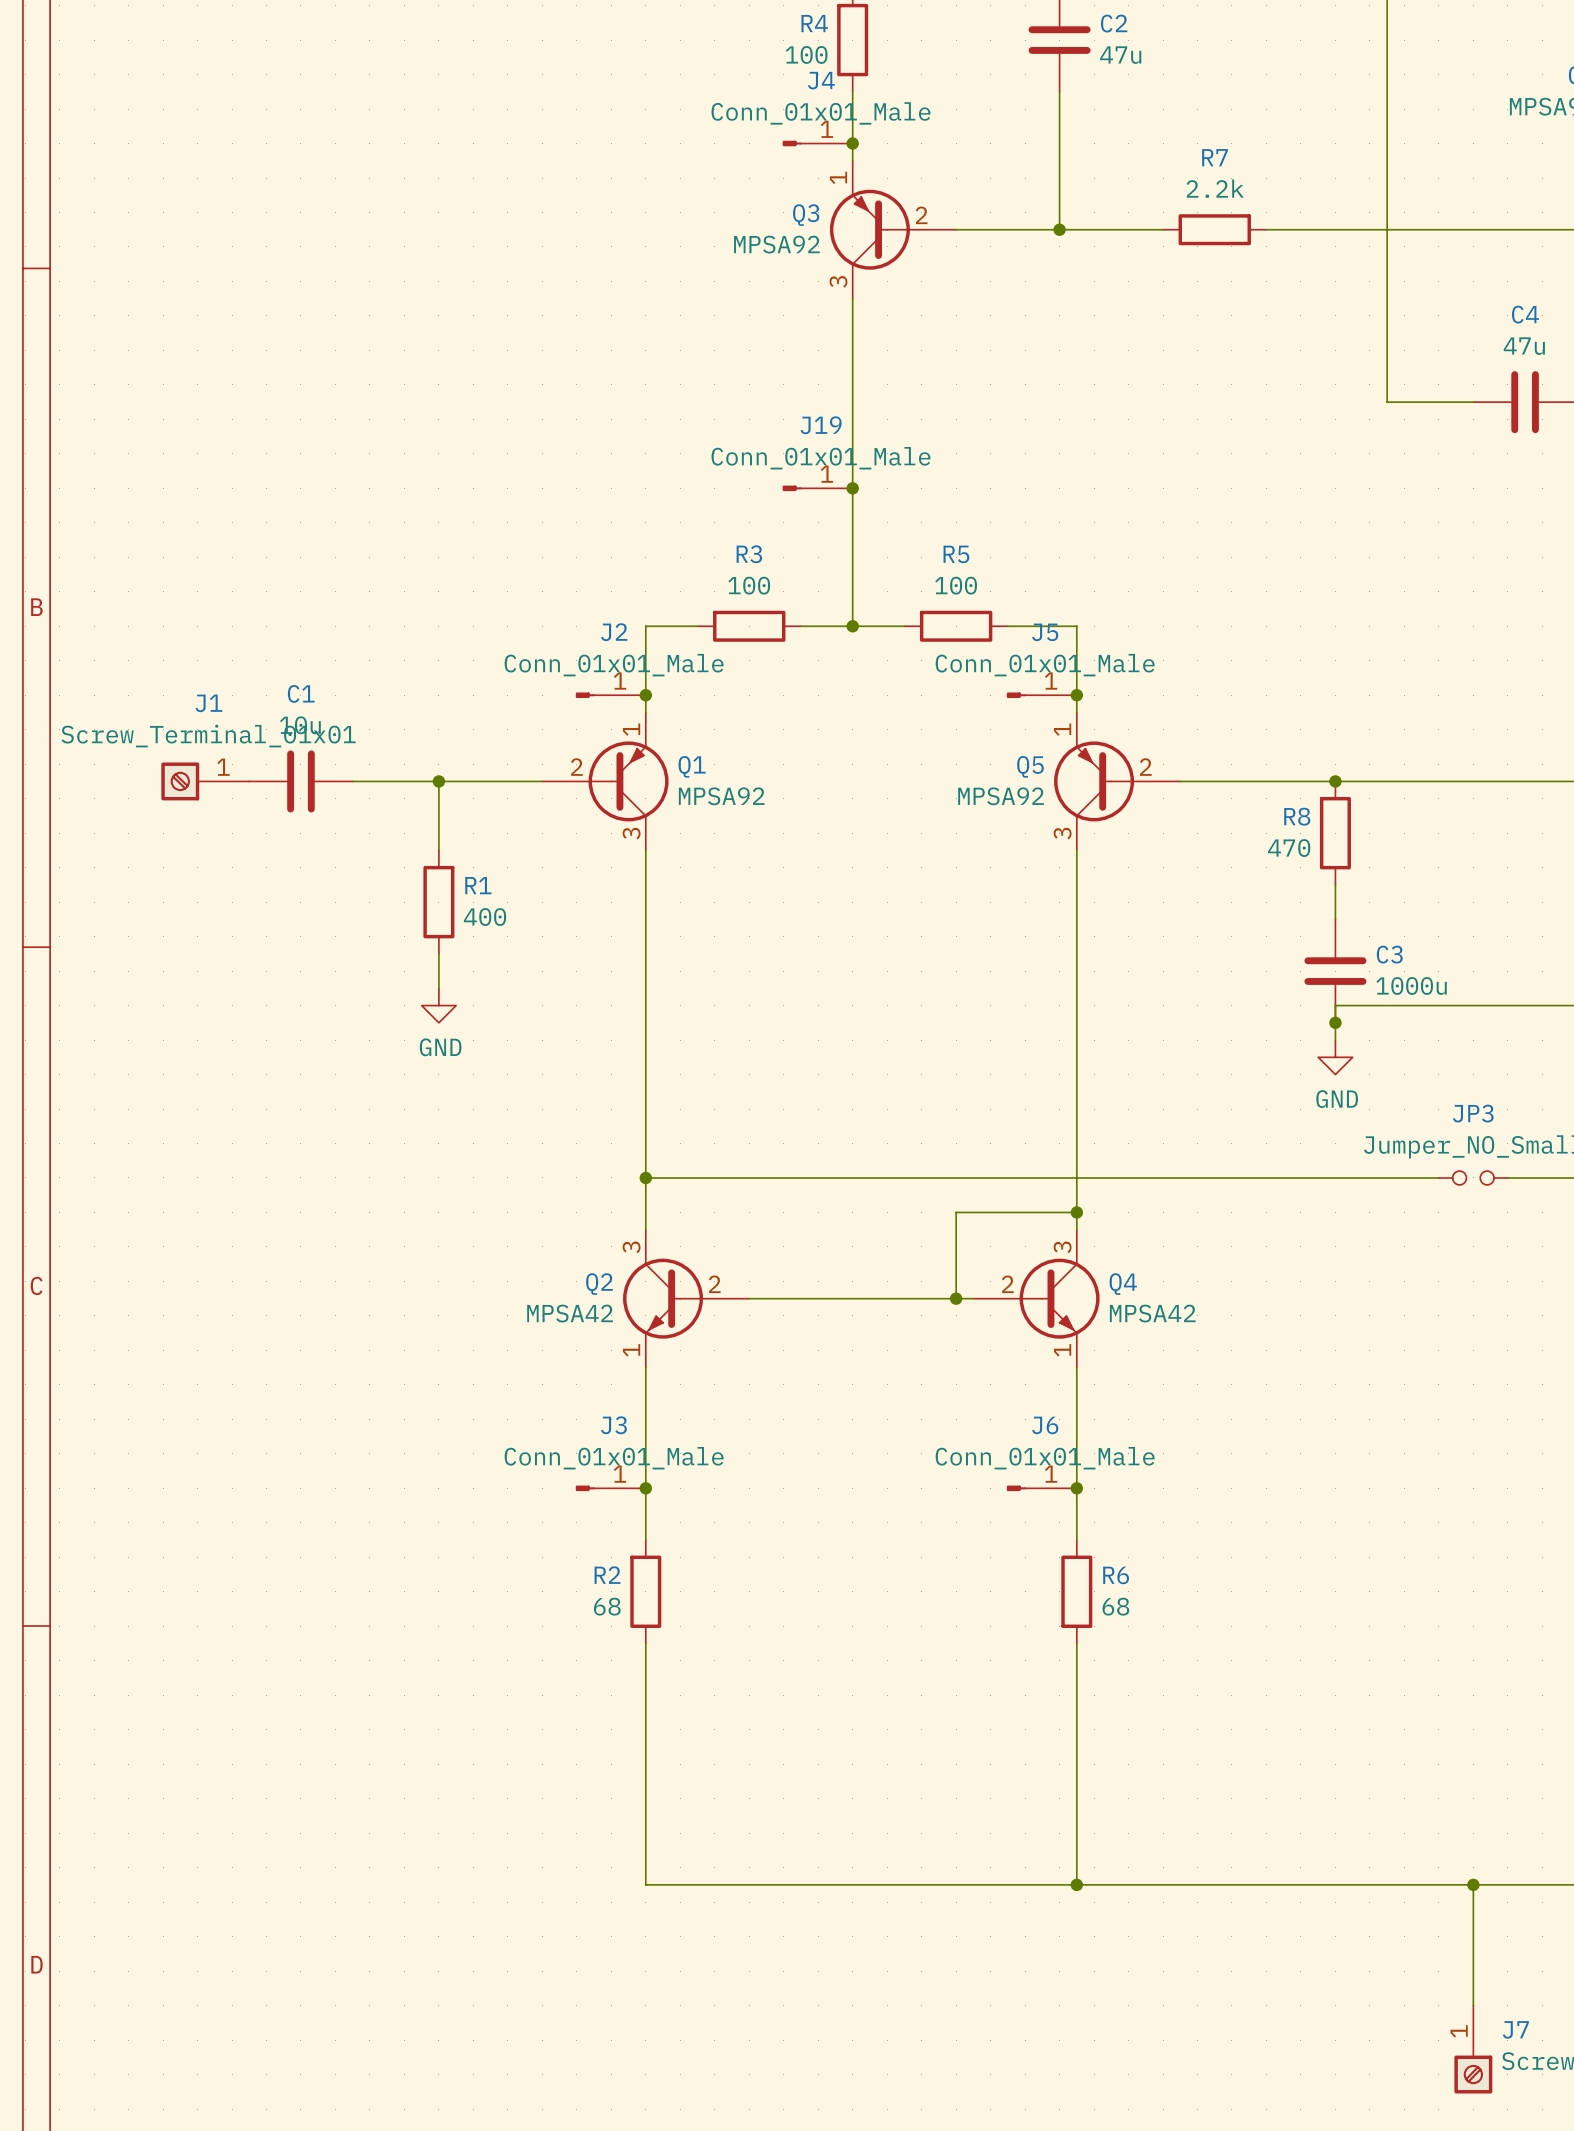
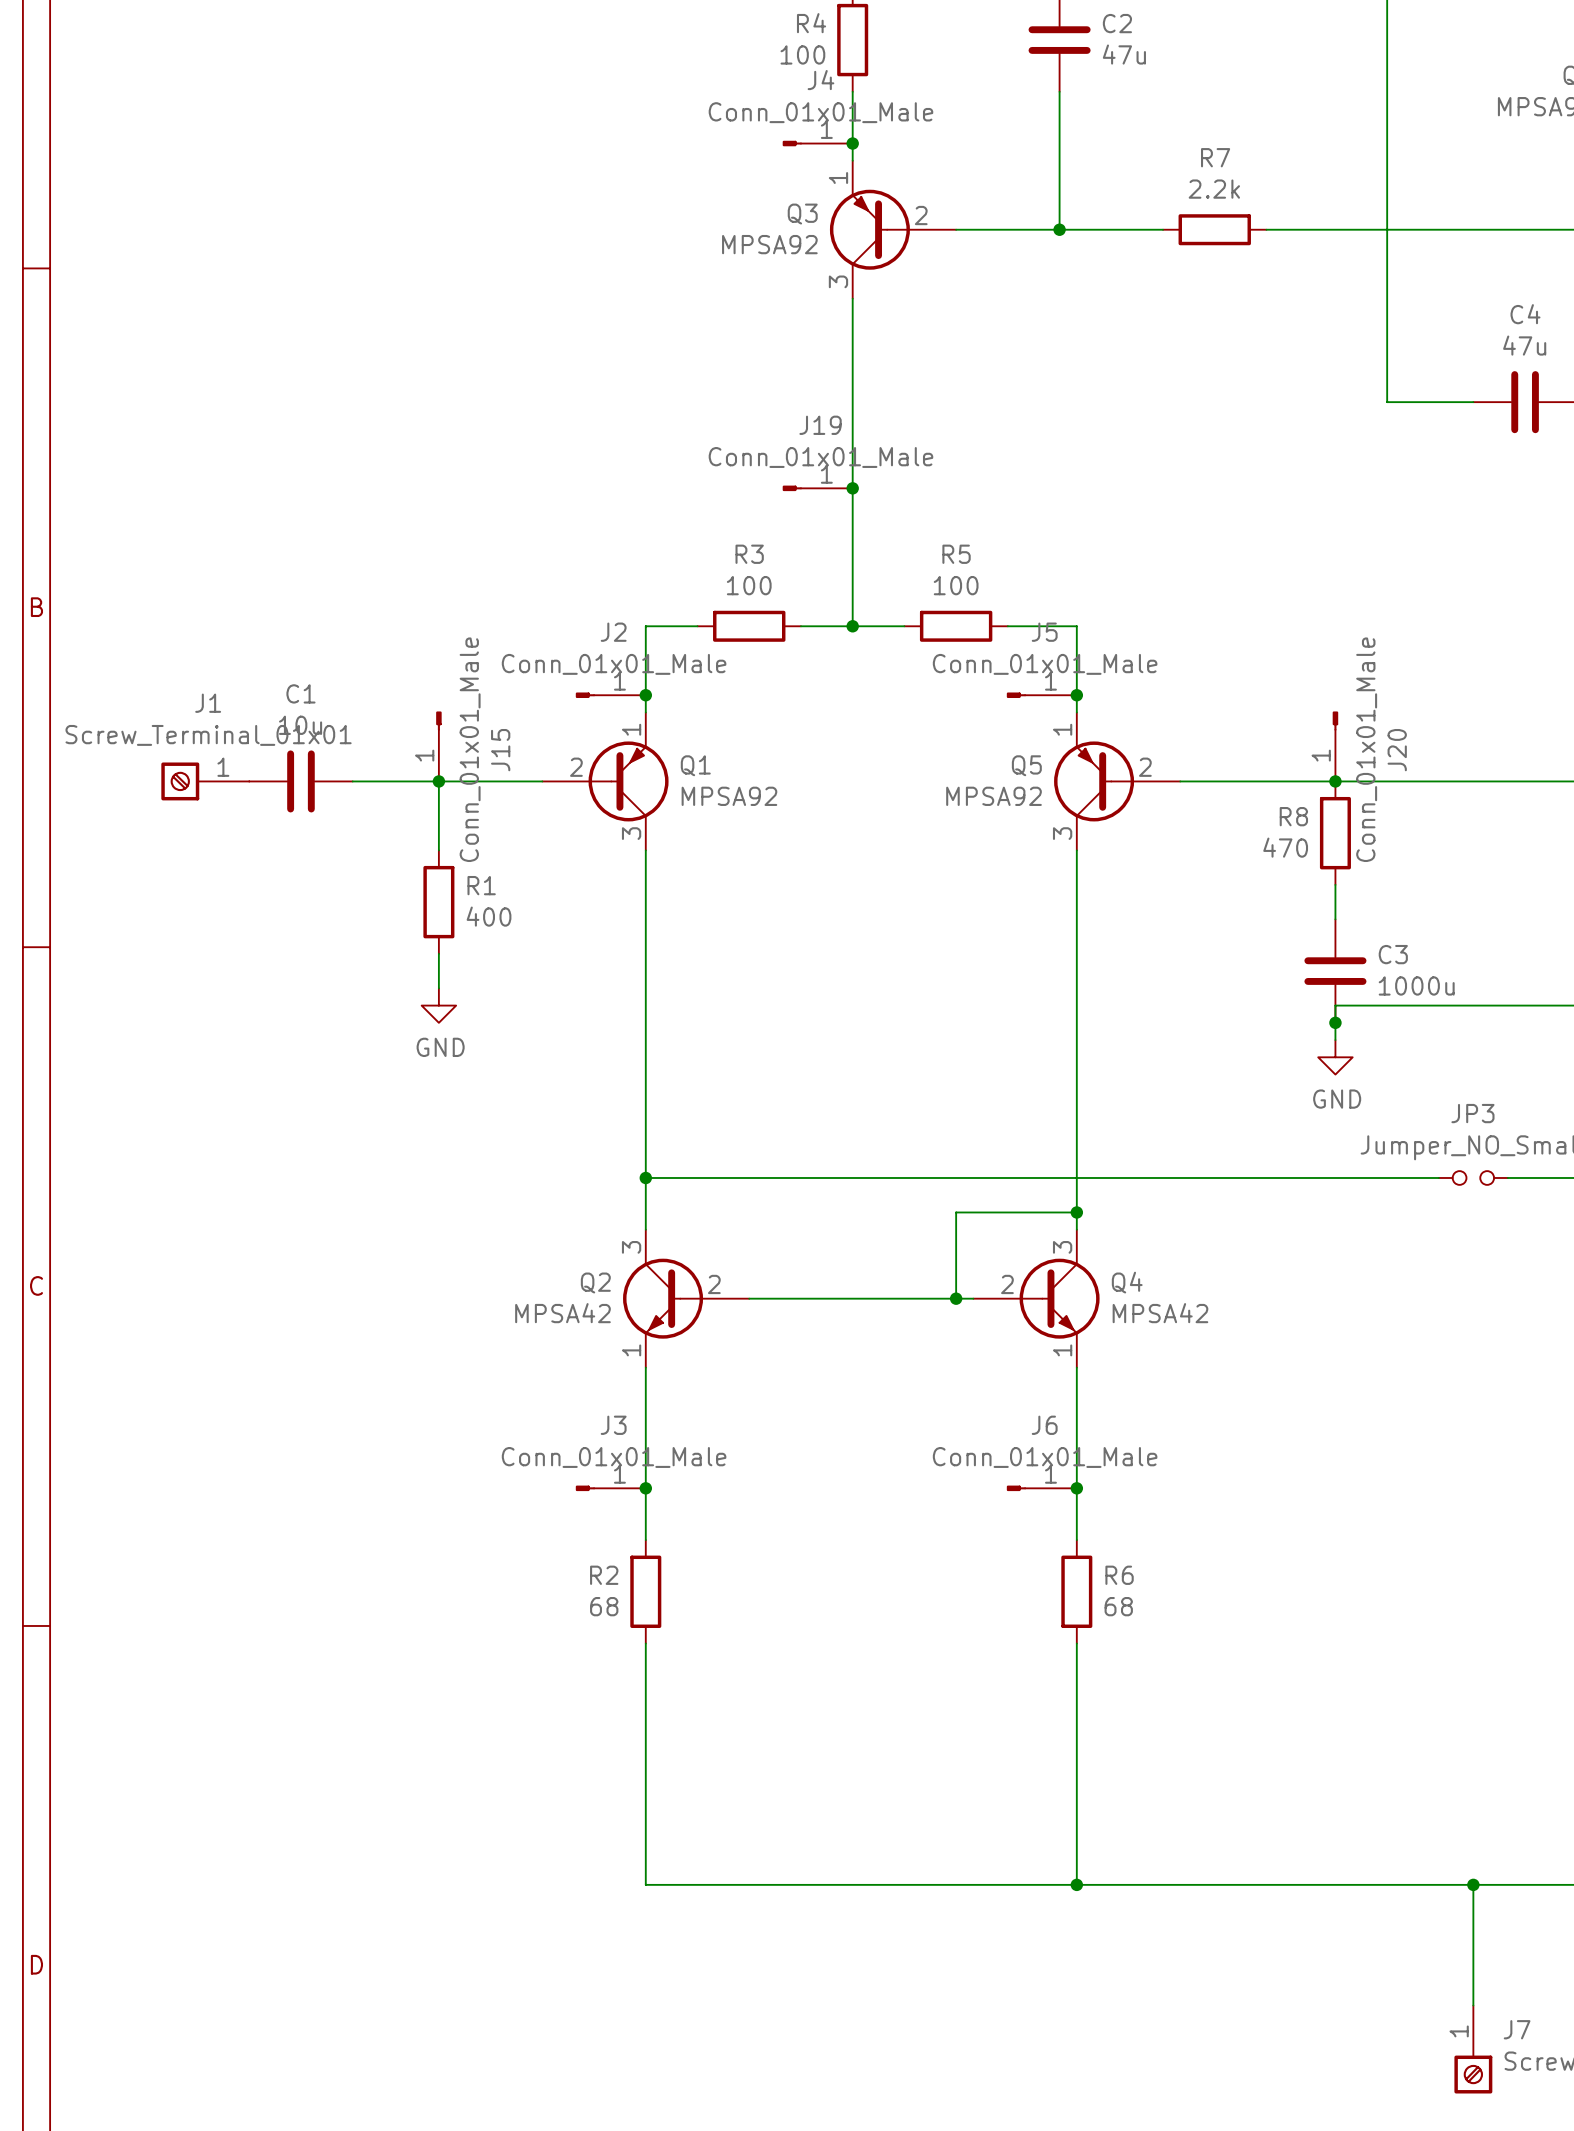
J15: none -> Conn_01x01_Male (438, 746)
J20: none -> Conn_01x01_Male (1335, 746)

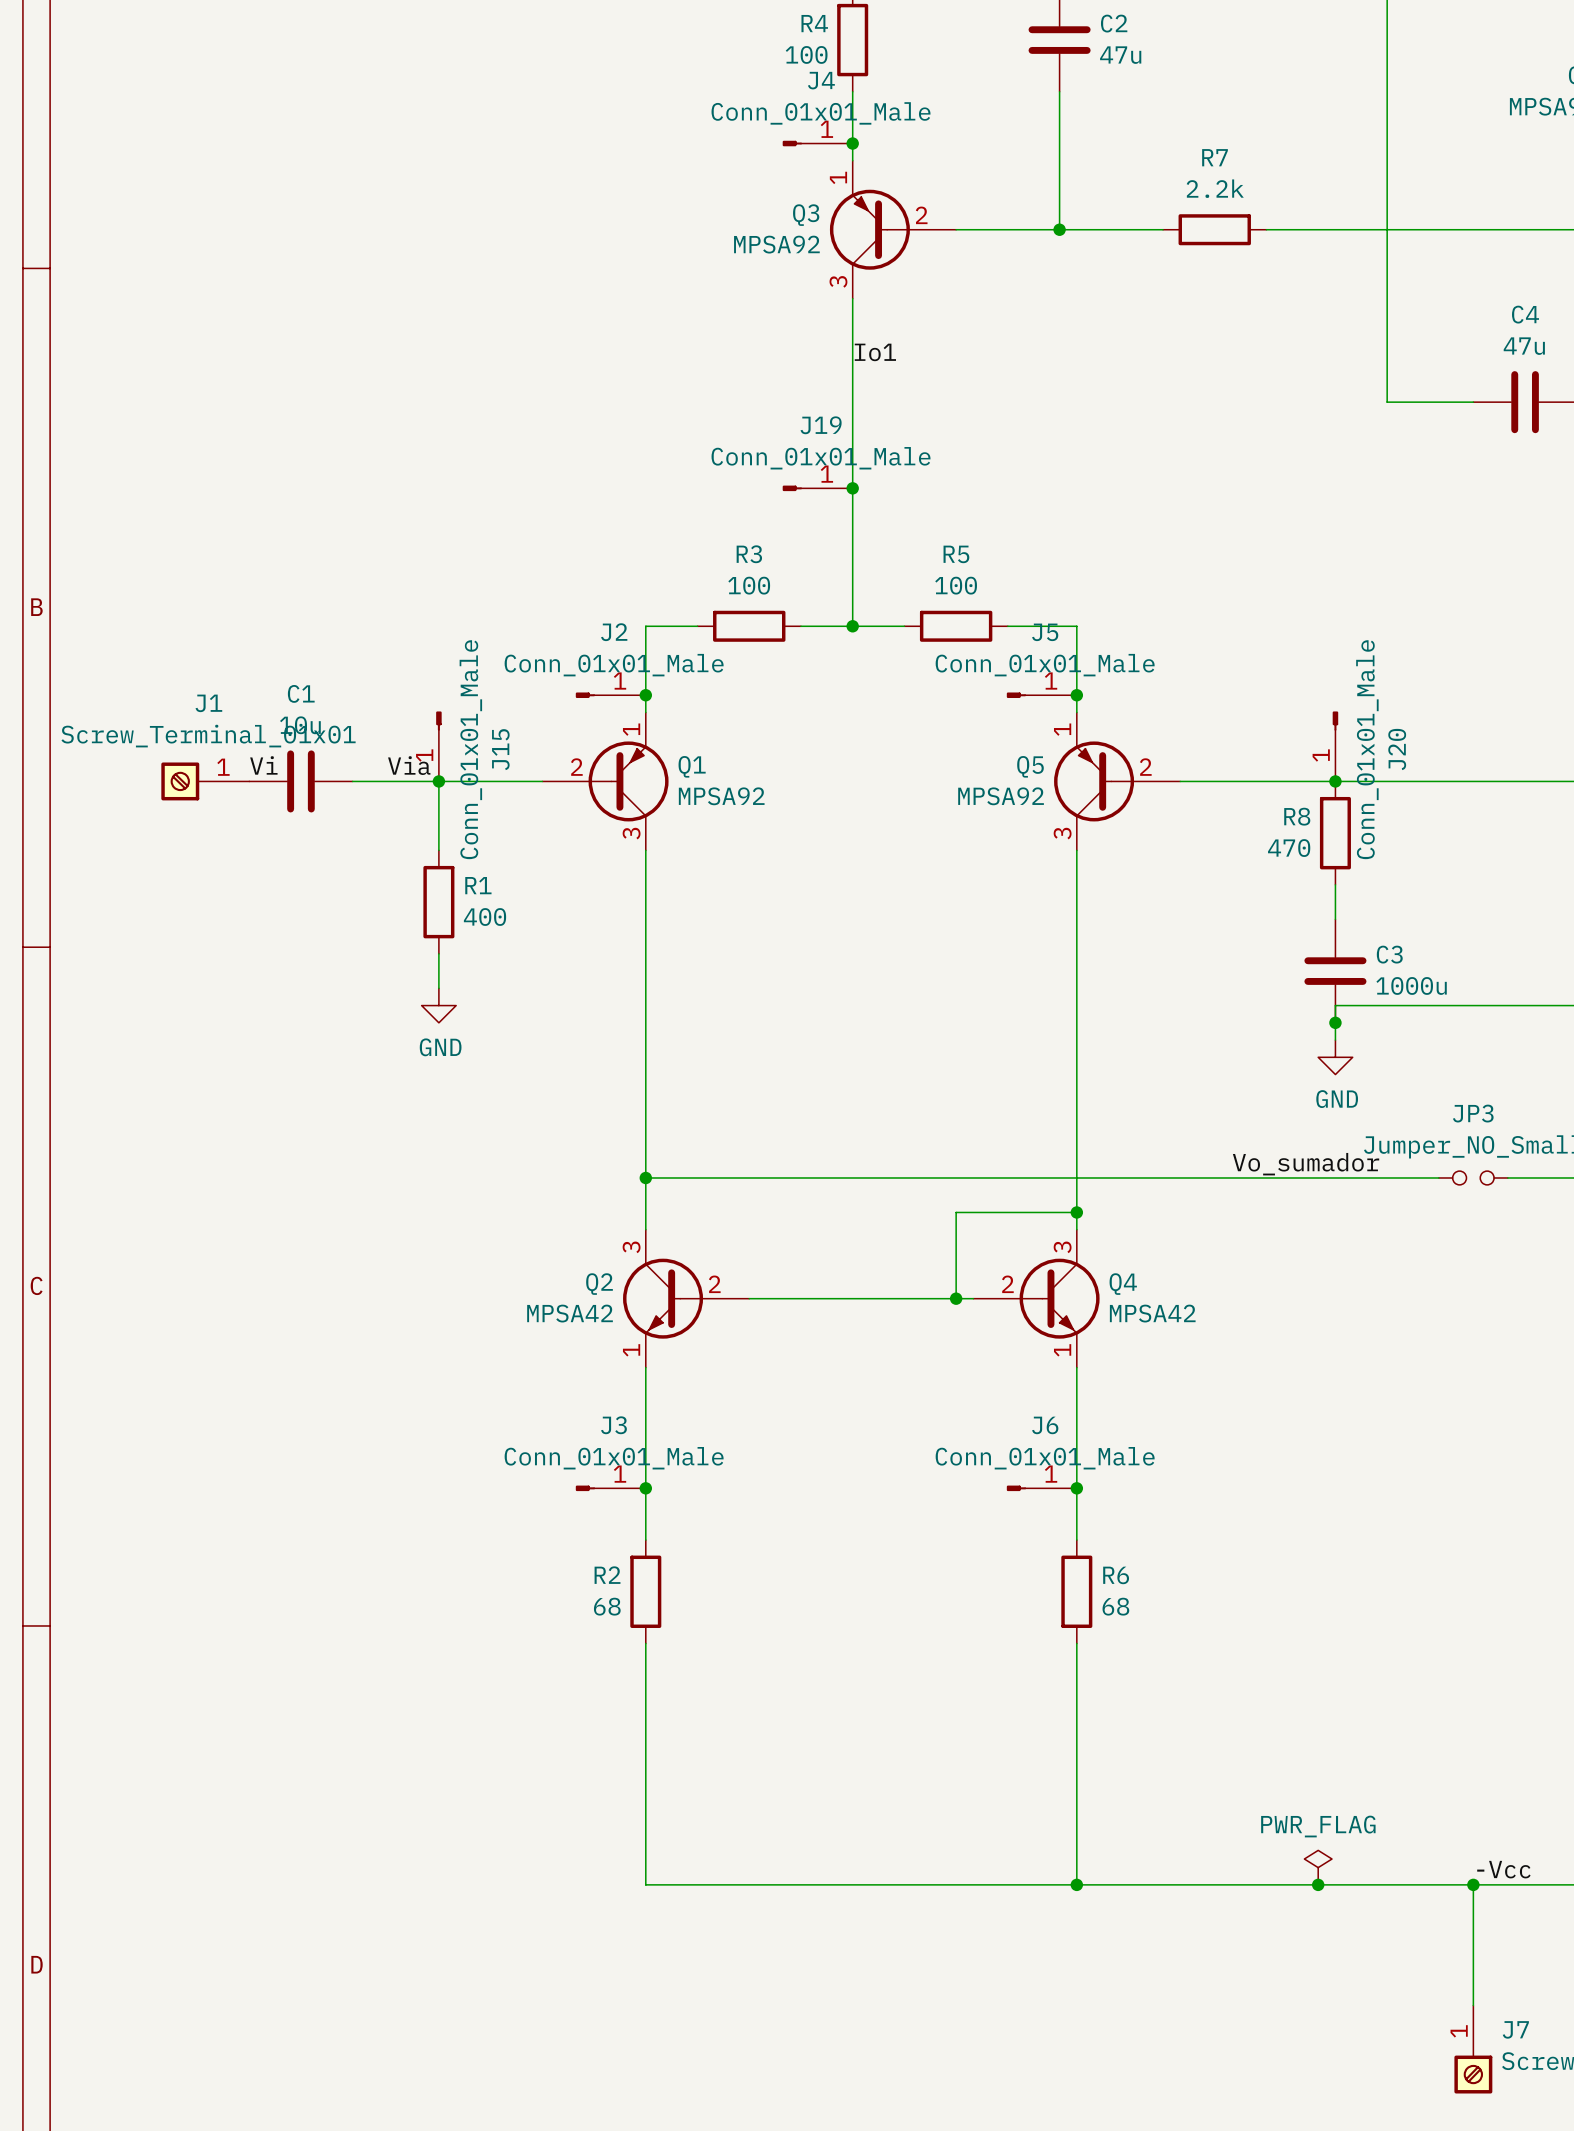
label: none -> Io1 (875, 352)
label: none -> Vi (263, 765)
label: none -> Via (409, 765)
label: none -> Vo_sumador (1306, 1164)
power symbol: none -> PWR_FLAG (1318, 1867)
label: none -> -Vcc (1503, 1869)
junction: none -> (1318, 1884)

